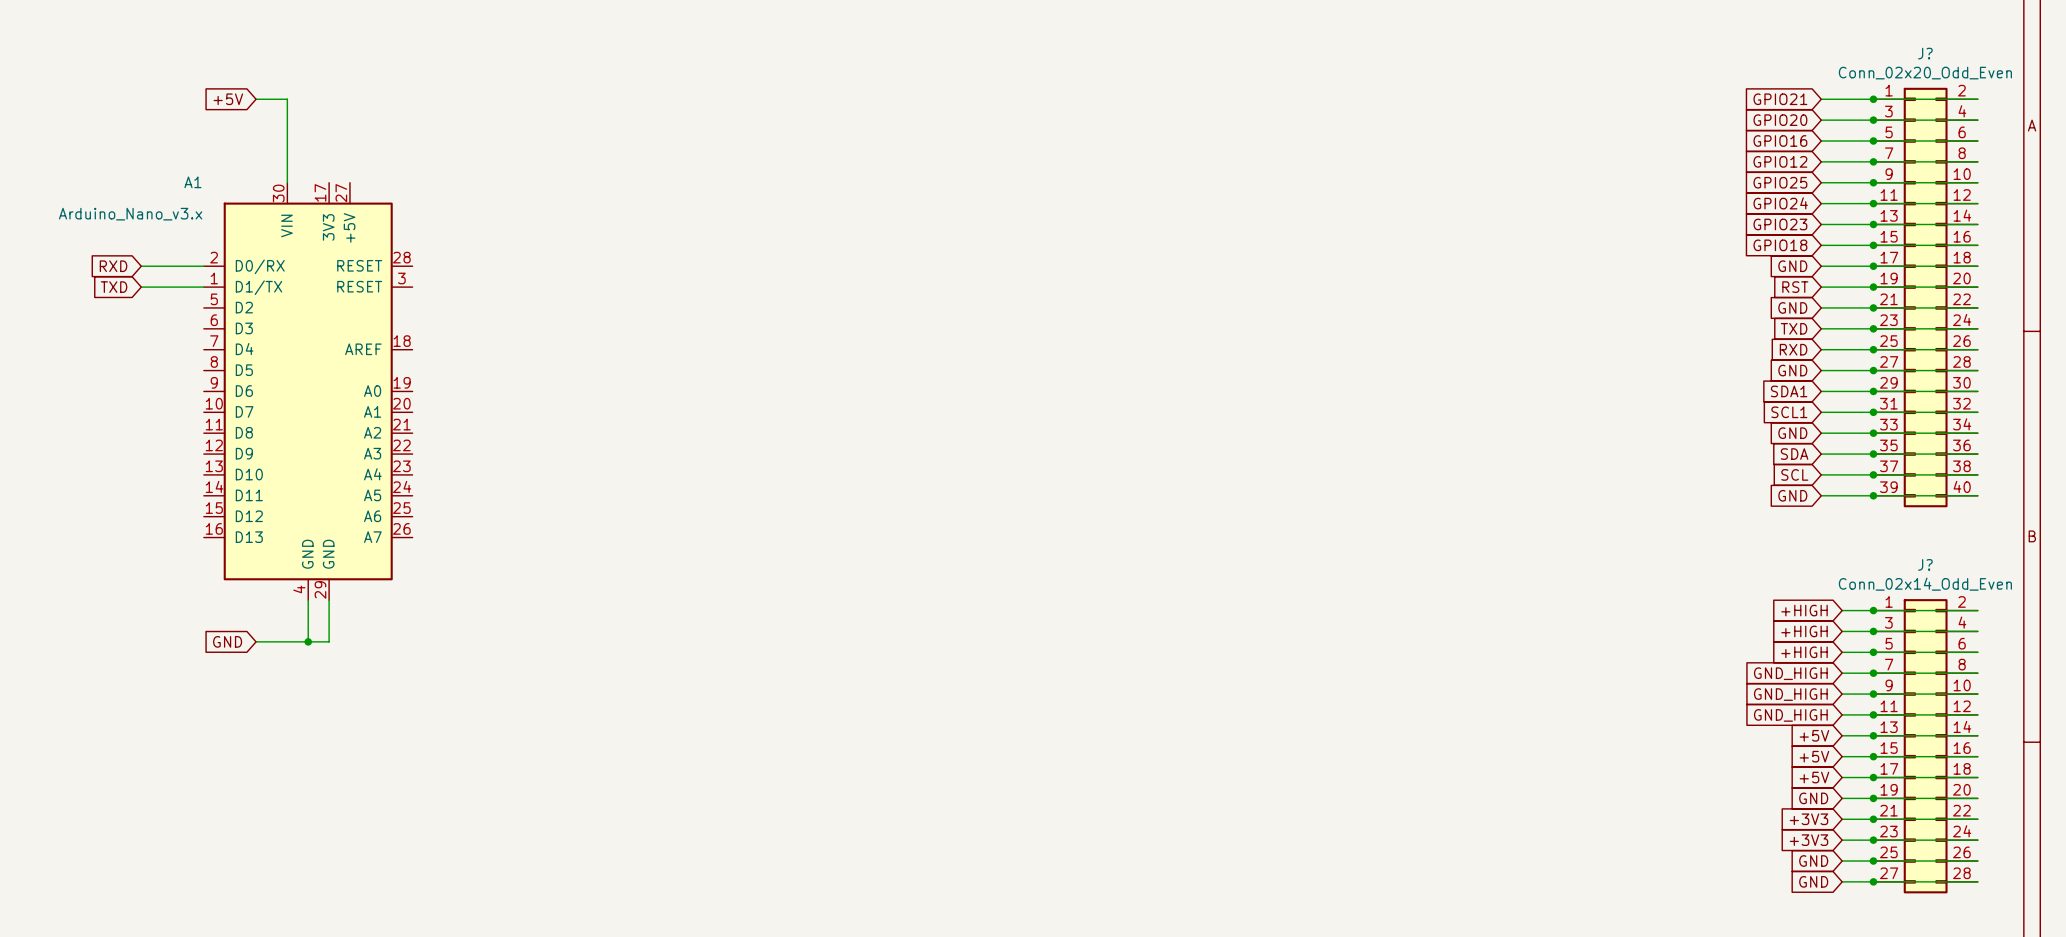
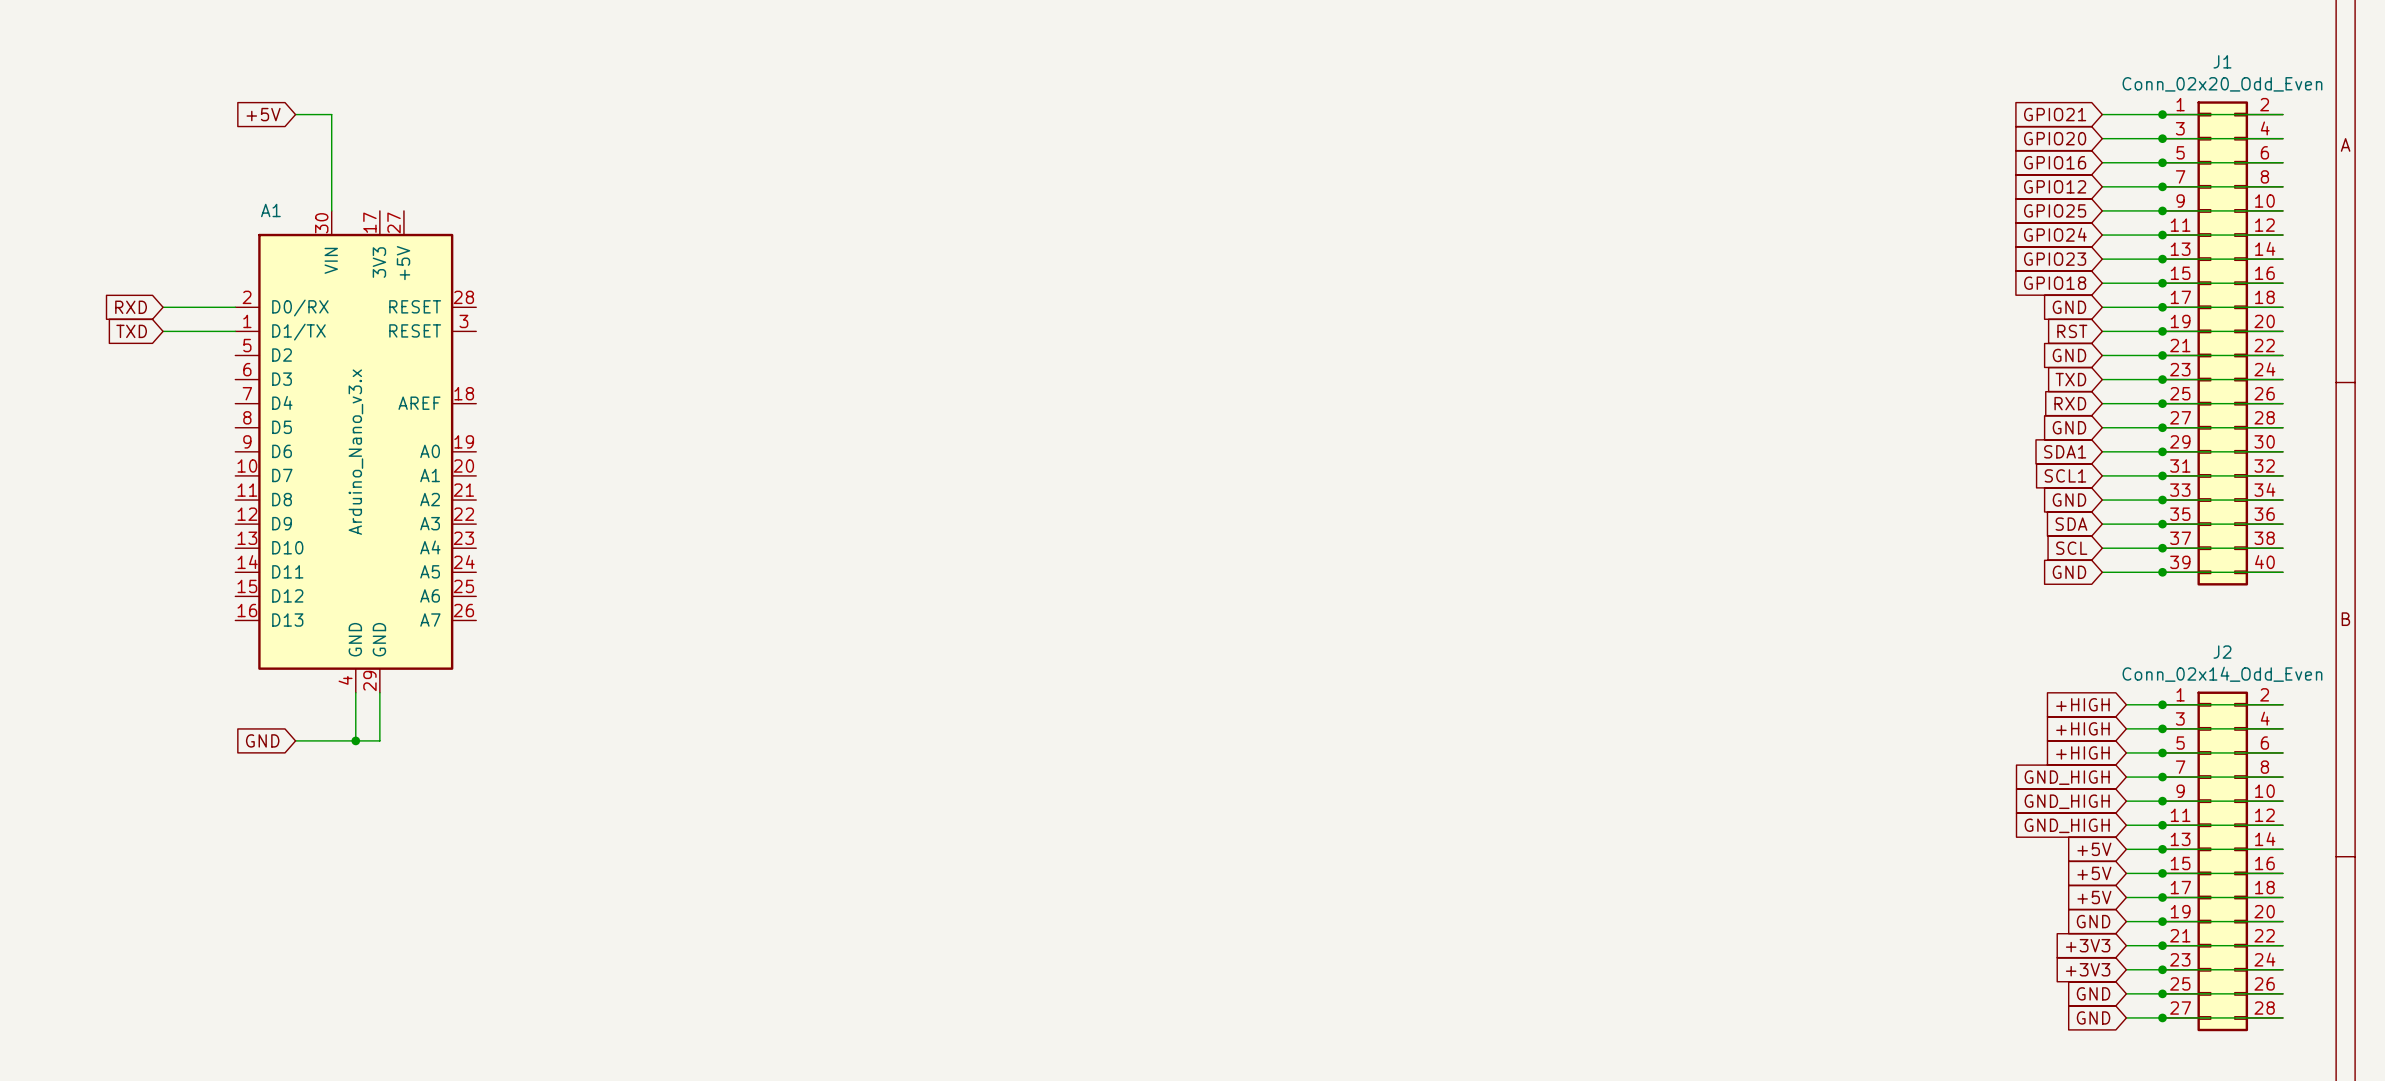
J? name: J? (1925, 53) -> J1 (2222, 61)
A1 name position: A1 (192, 182) -> A1 (270, 210)
A1 value rotation: 0° (130, 214) -> 90° counterclockwise (355, 452)
A1 value position: Arduino_Nano_v3.x (130, 214) -> Arduino_Nano_v3.x (355, 452)
J? name: J? (1925, 564) -> J2 (2222, 652)

